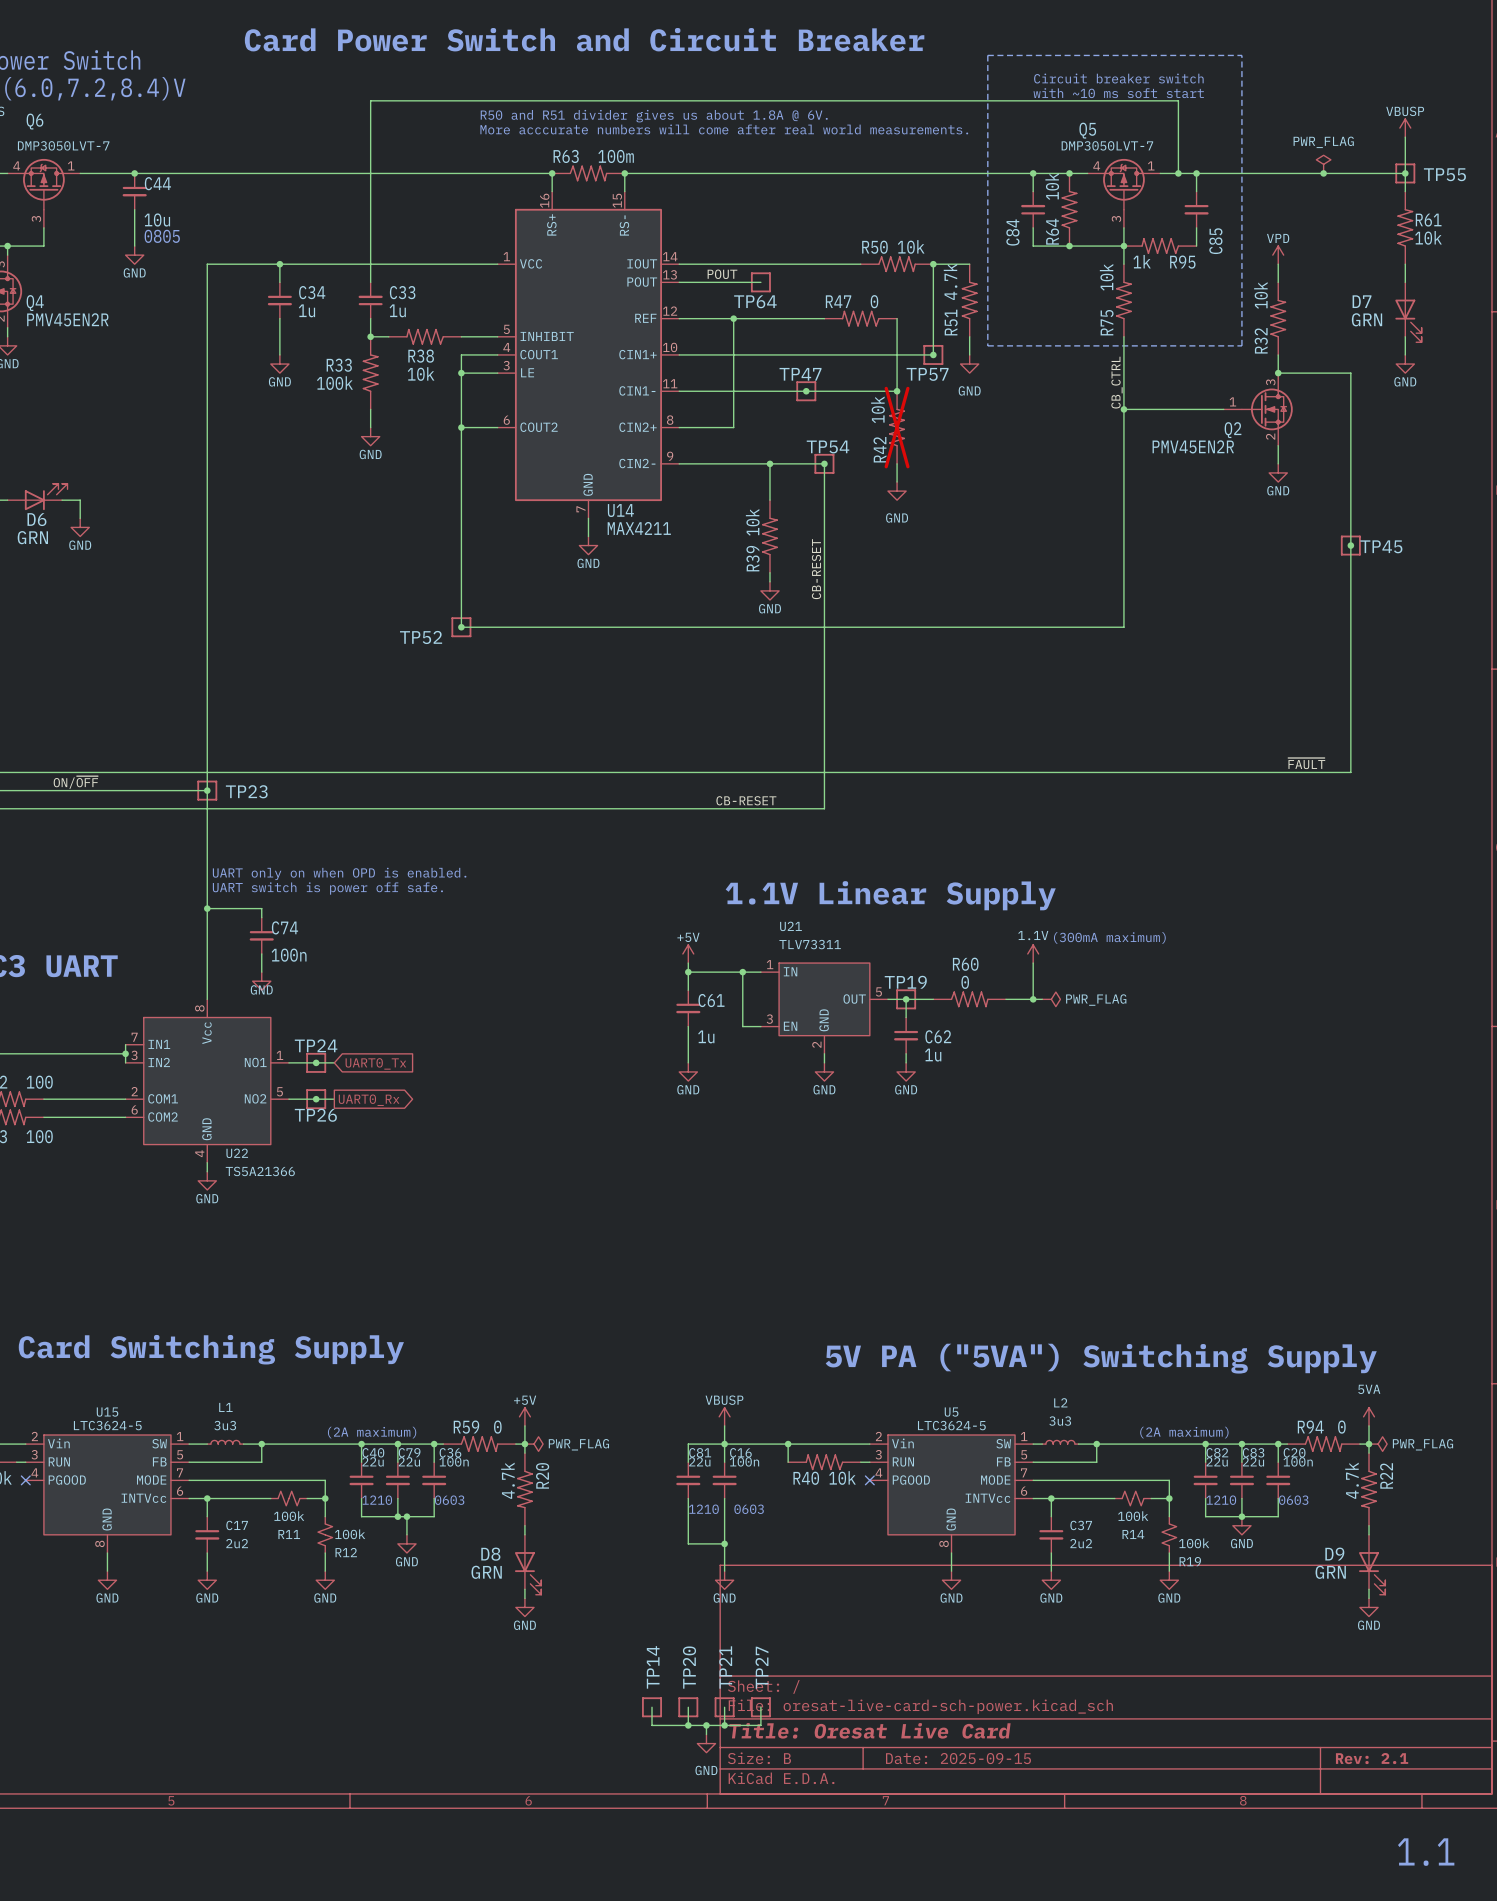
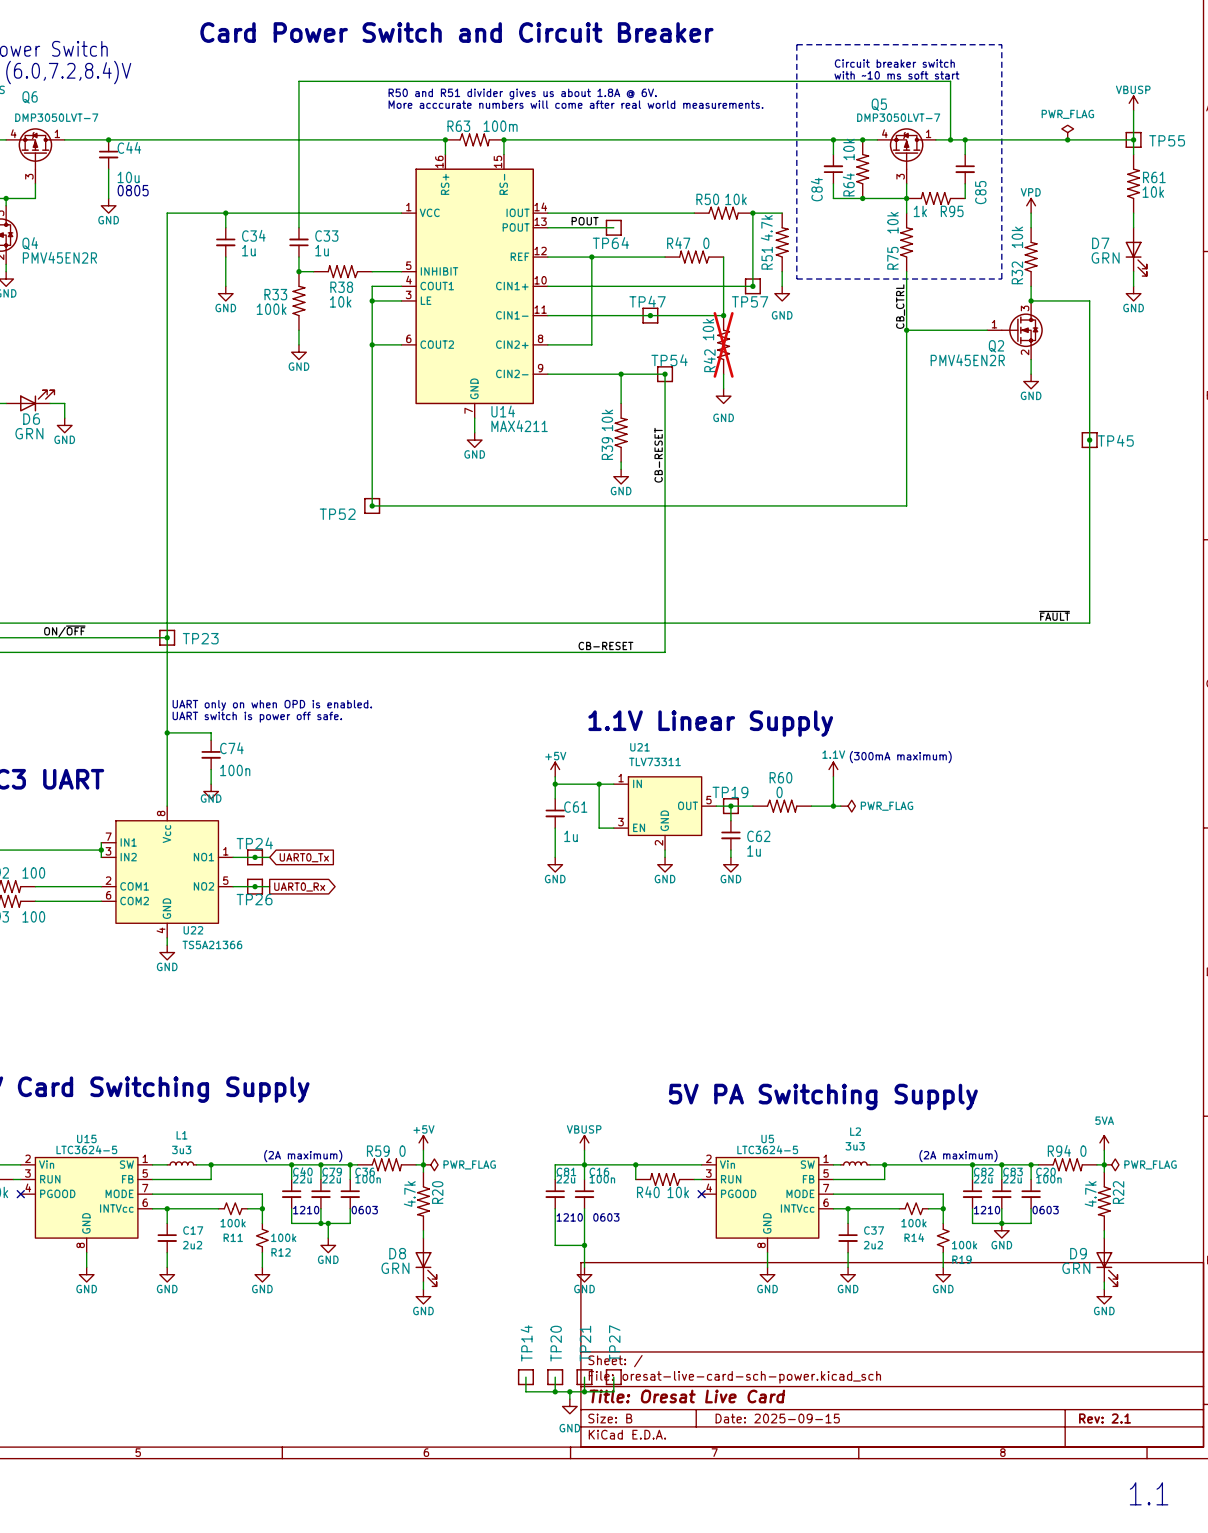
text: 5V PA ("5VA") Switching Supply (1101, 1358) -> 5V PA Switching Supply (823, 1096)

